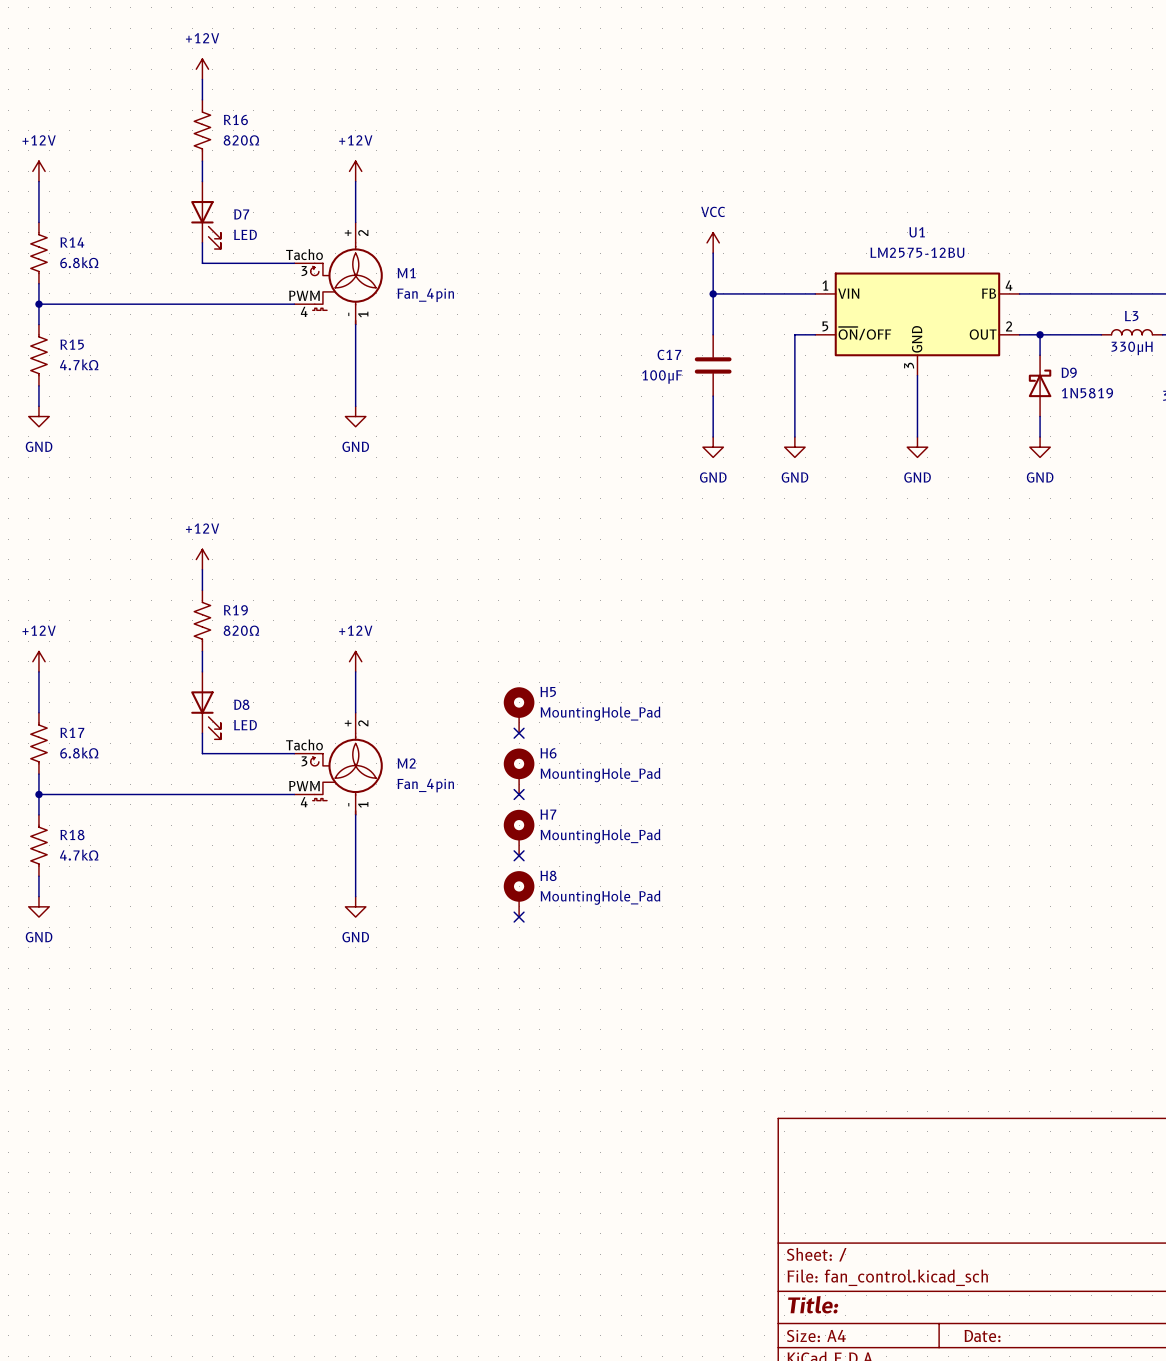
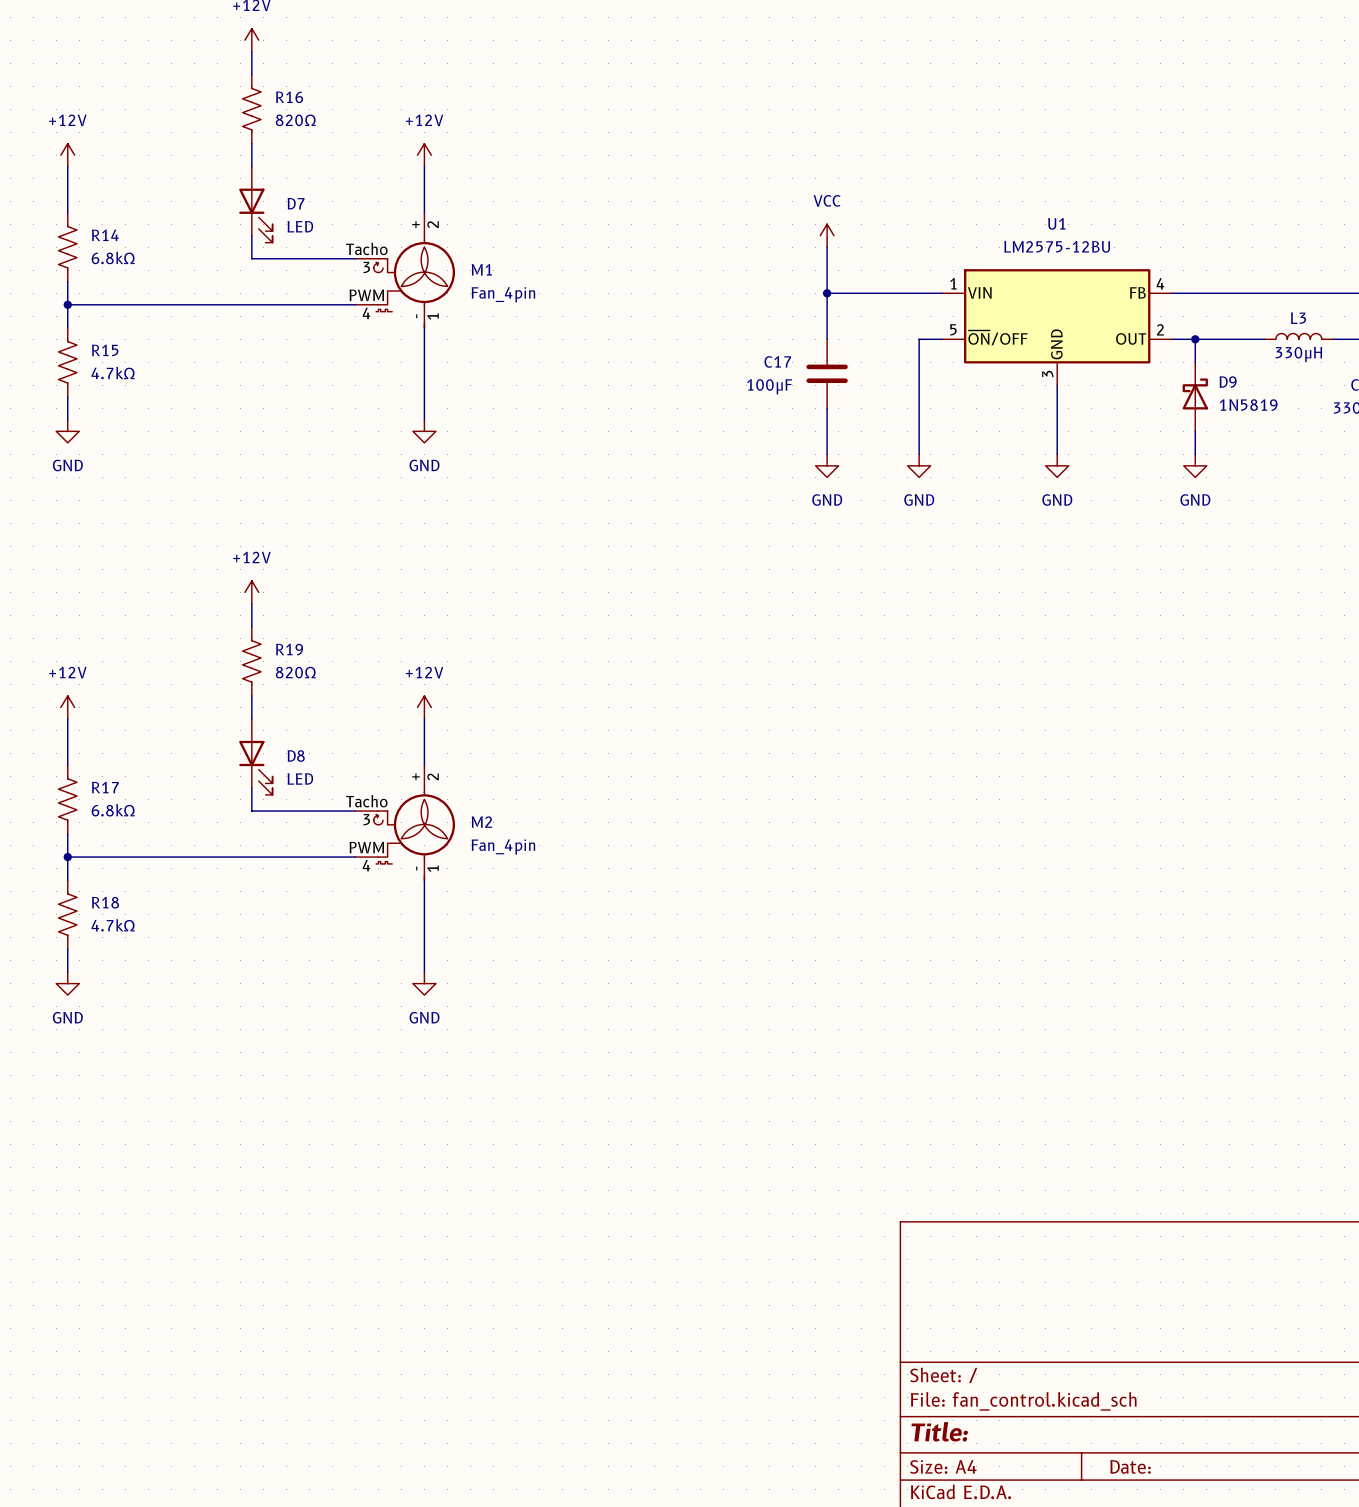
H5: MountingHole_Pad (519, 710) -> none
no-connect mark: (519, 733) -> none
H6: MountingHole_Pad (519, 771) -> none
no-connect mark: (519, 794) -> none
H7: MountingHole_Pad (519, 832) -> none
no-connect mark: (519, 855) -> none
H8: MountingHole_Pad (519, 894) -> none
no-connect mark: (519, 917) -> none

